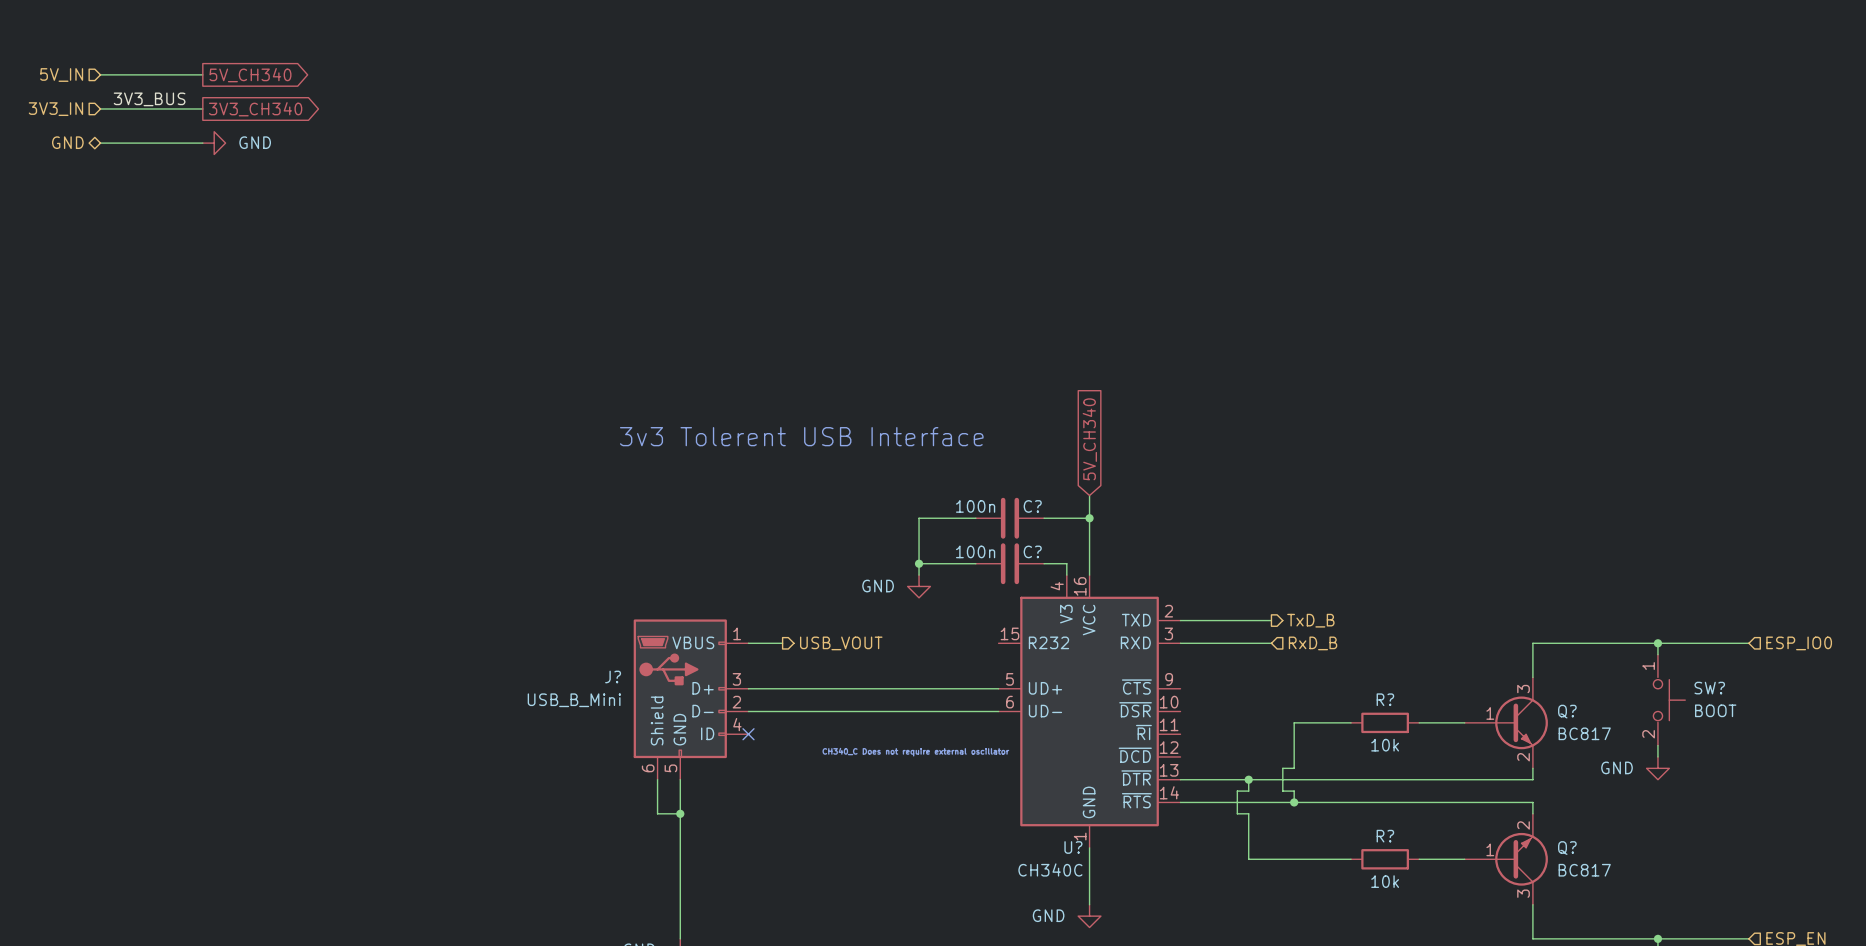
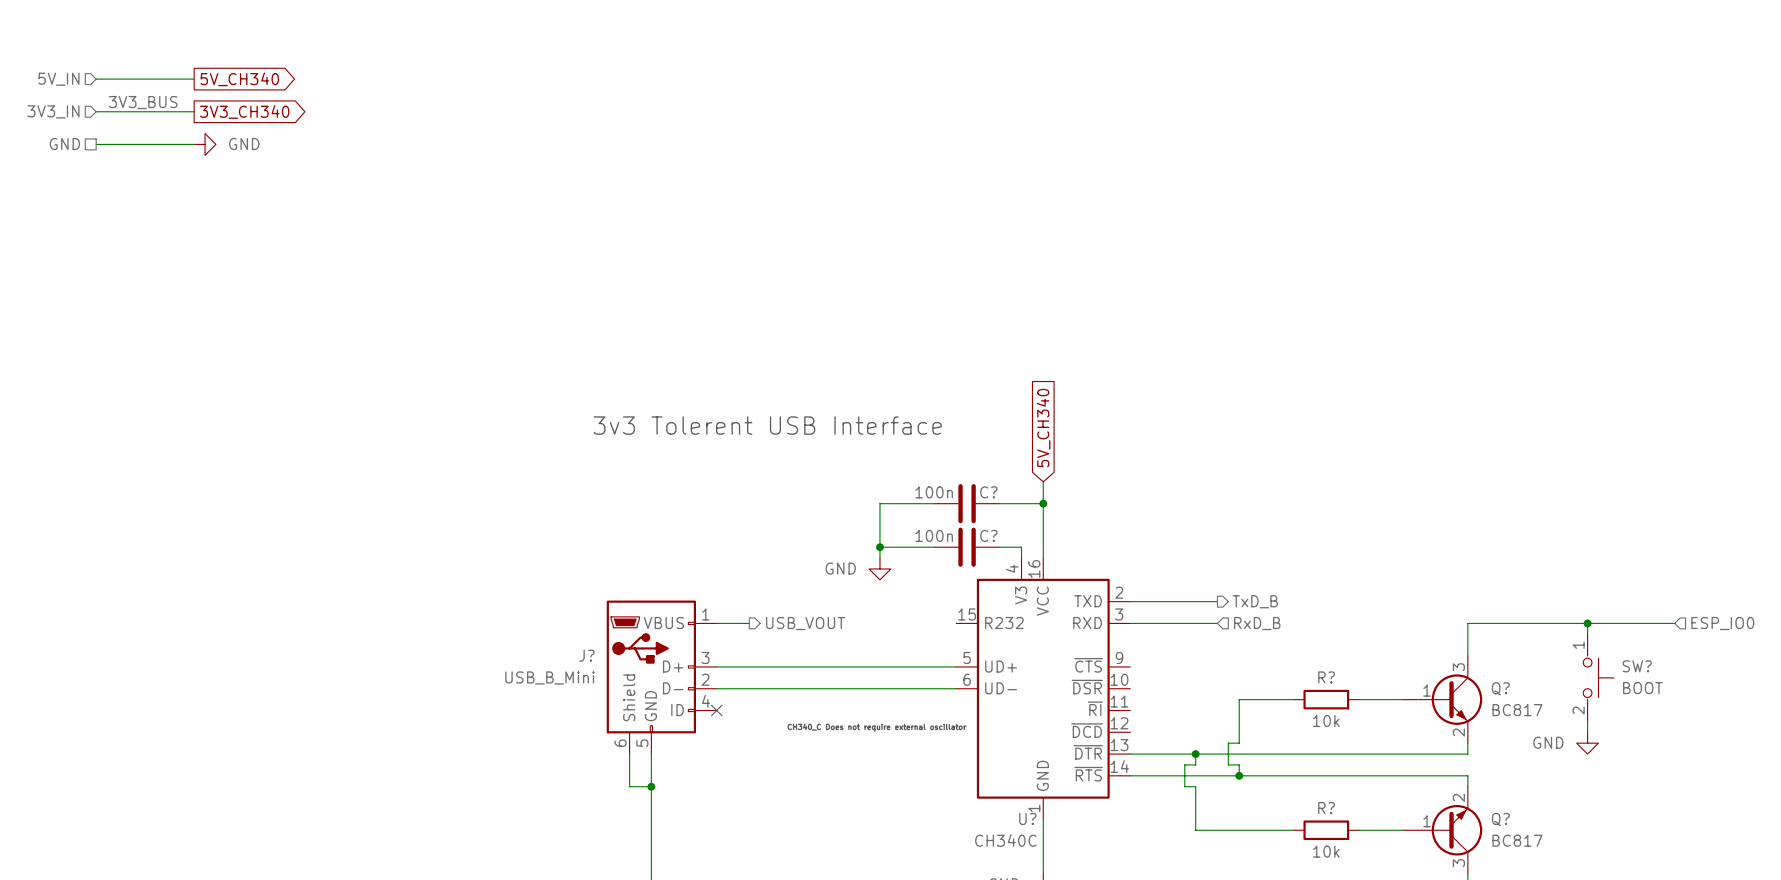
hierarchical label shape: bidirectional (67, 142) -> passive (64, 144)

